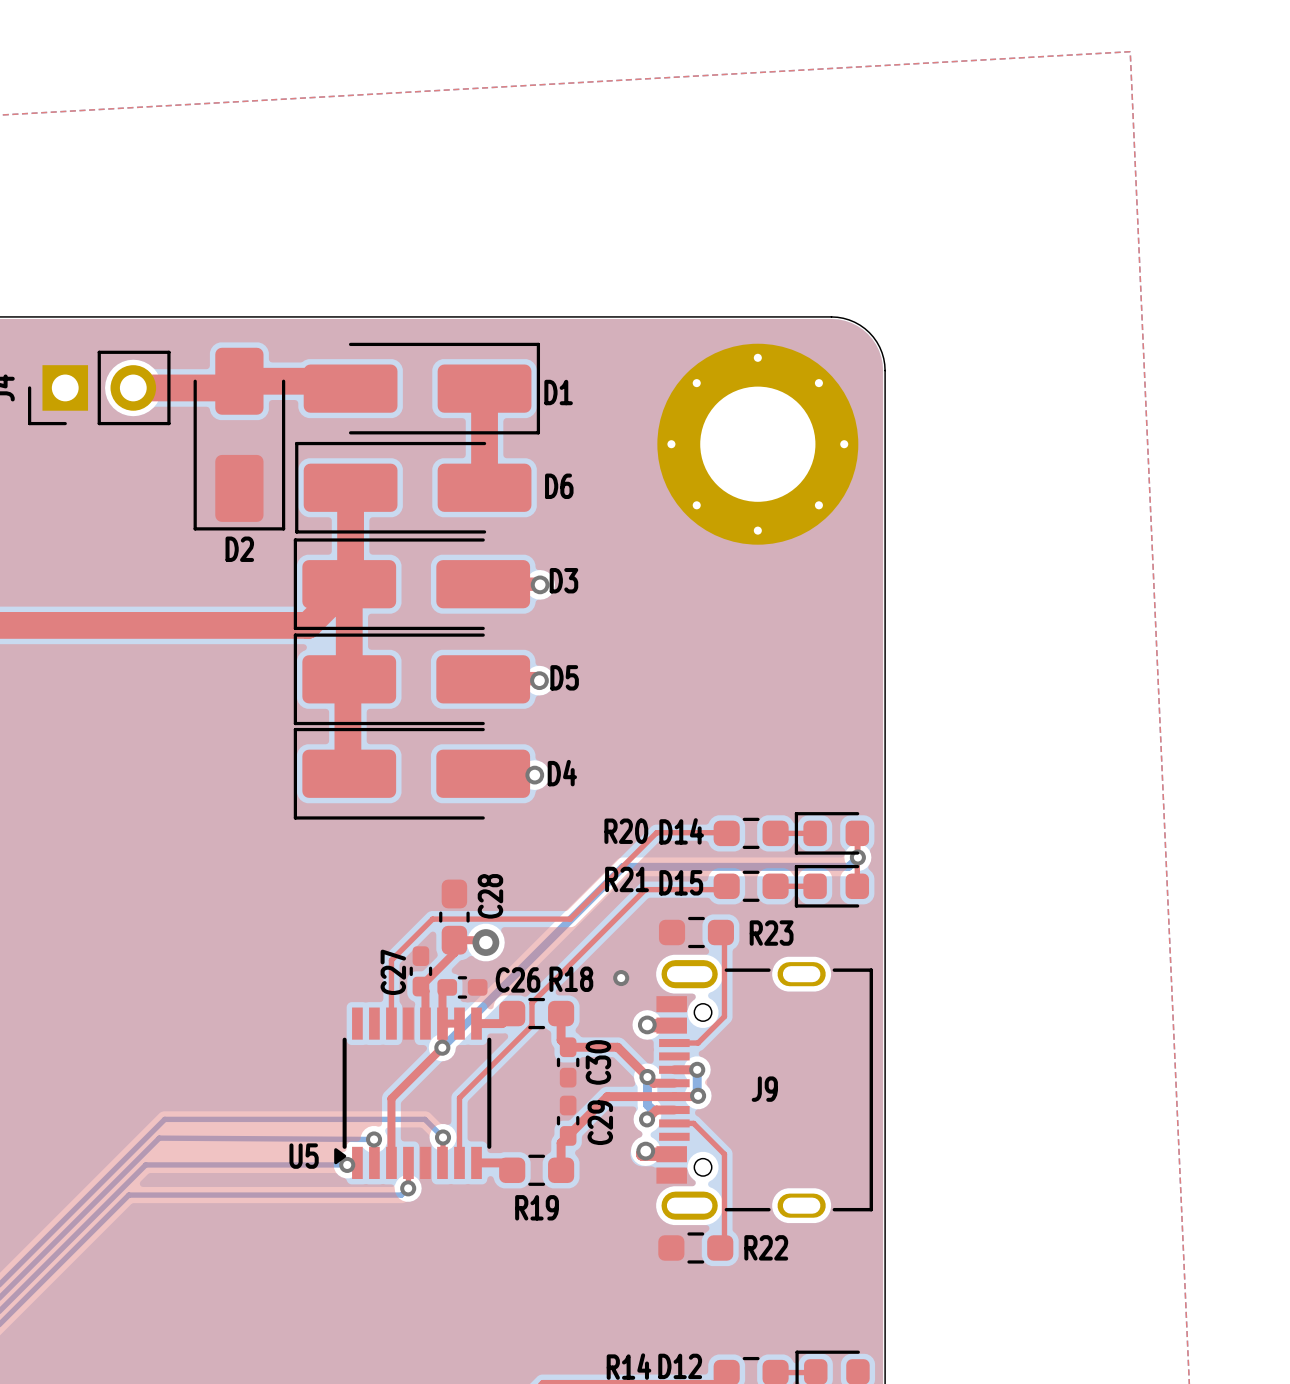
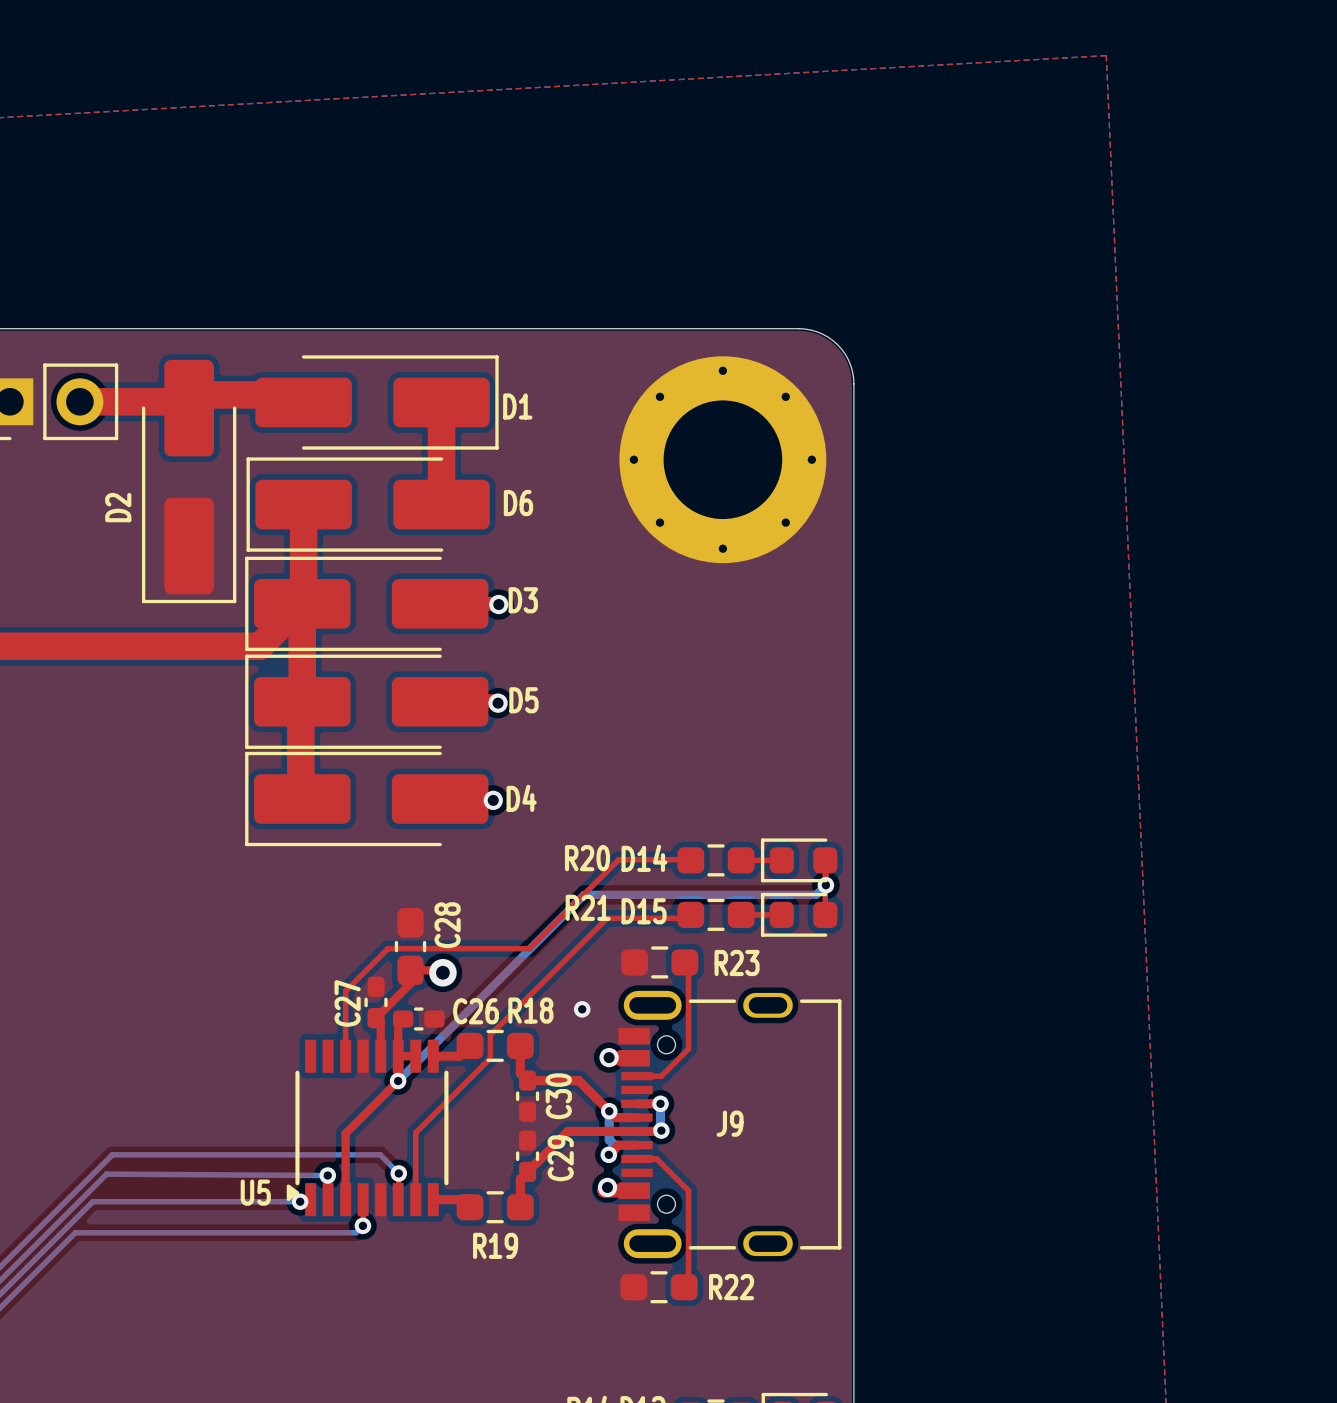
D2 footprint: [193, 347, 286, 531] -> [141, 359, 237, 604]
D2 name position: D2 (239, 549) -> D2 (118, 507)

